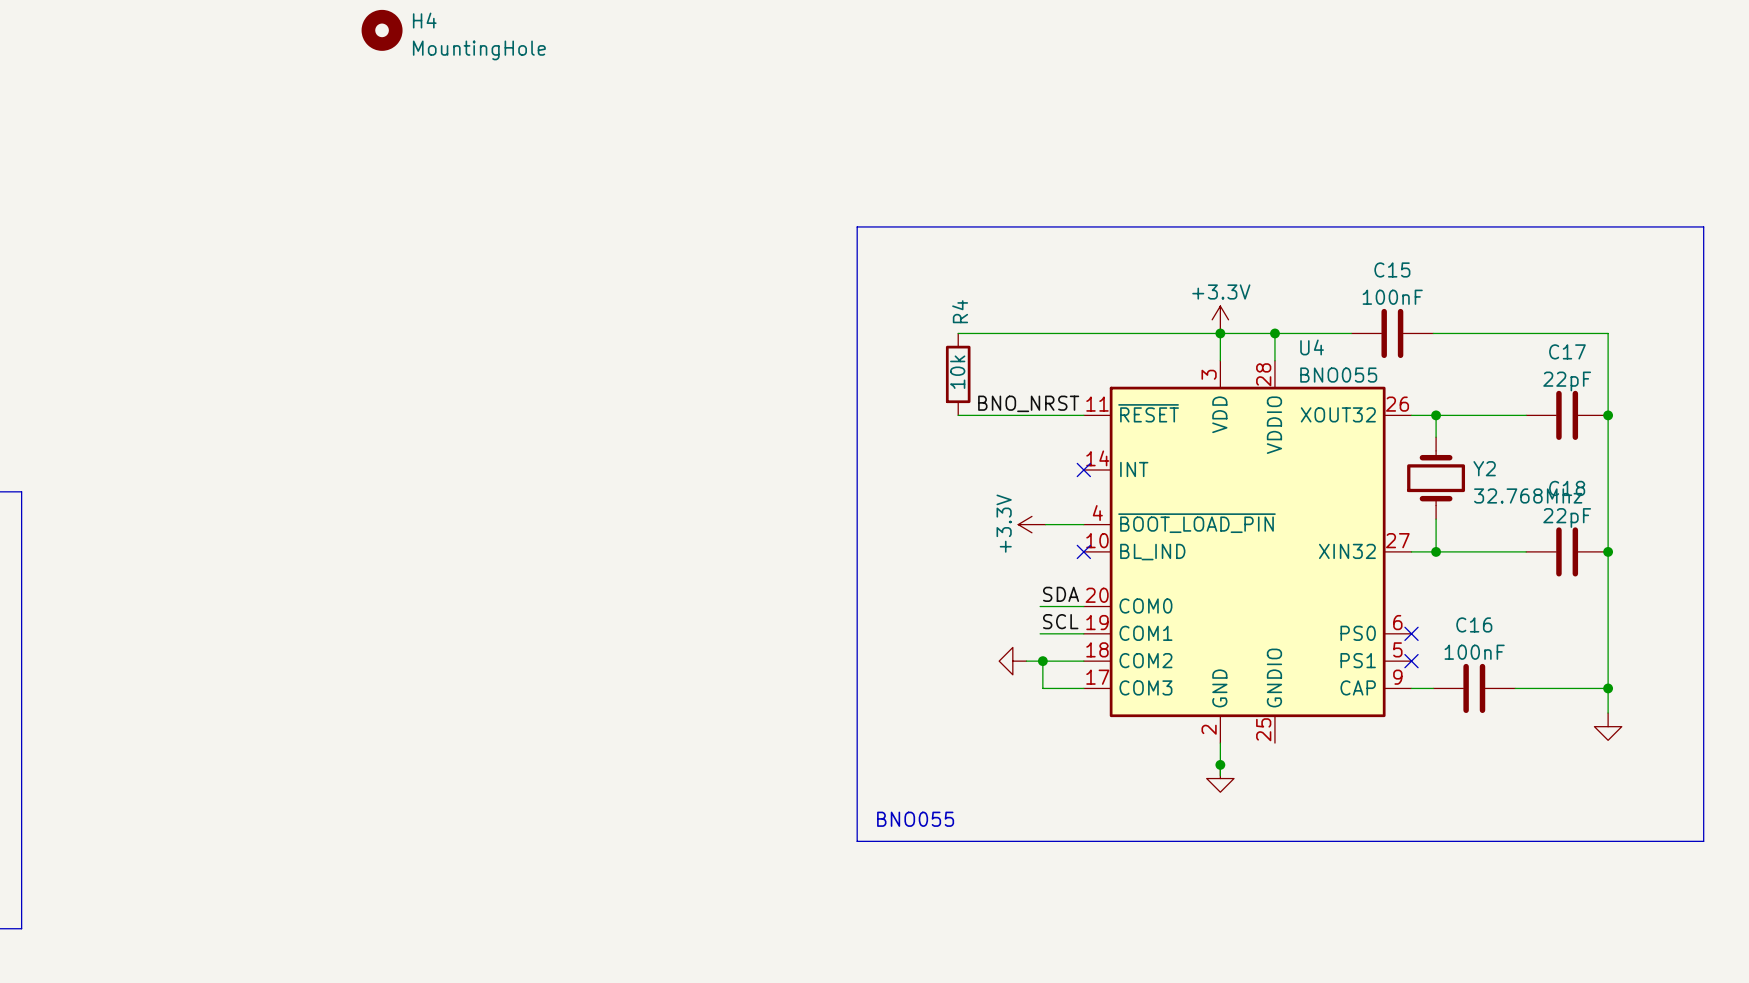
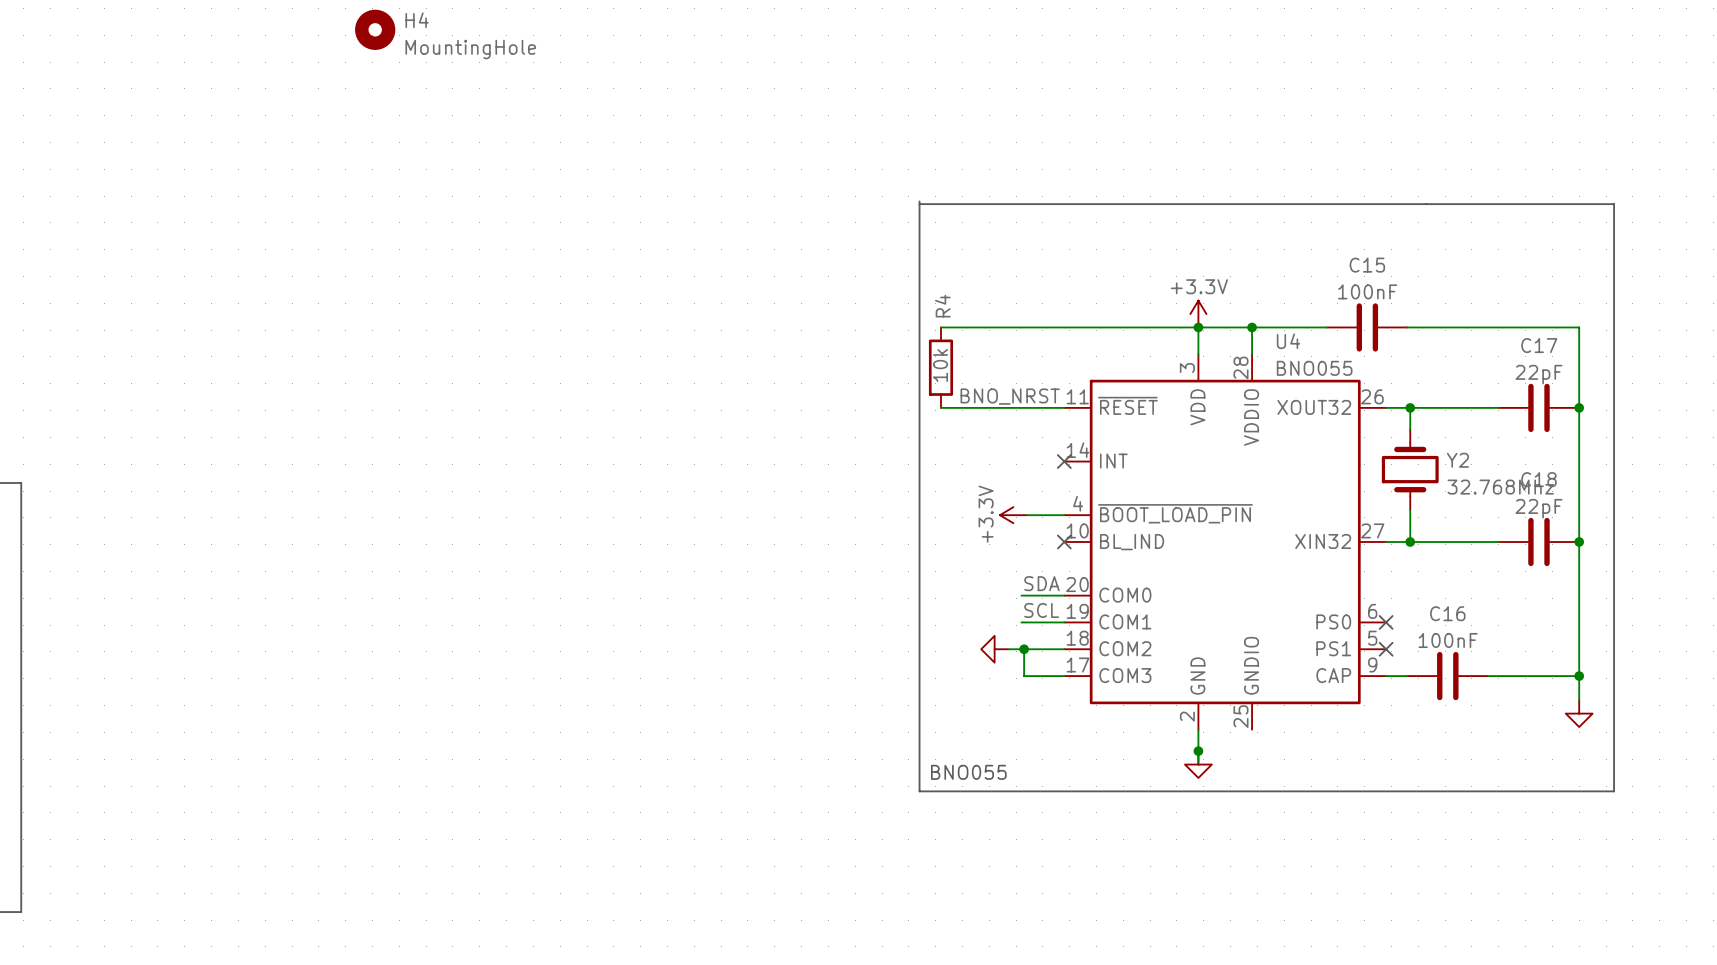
line: none -> (919, 201) (919, 791) (1614, 791) (1614, 204) (919, 204)
line: (857, 226) (1703, 226) (1703, 841) (857, 841) (857, 226) -> none
text position: BNO055 (915, 819) -> BNO055 (968, 772)

